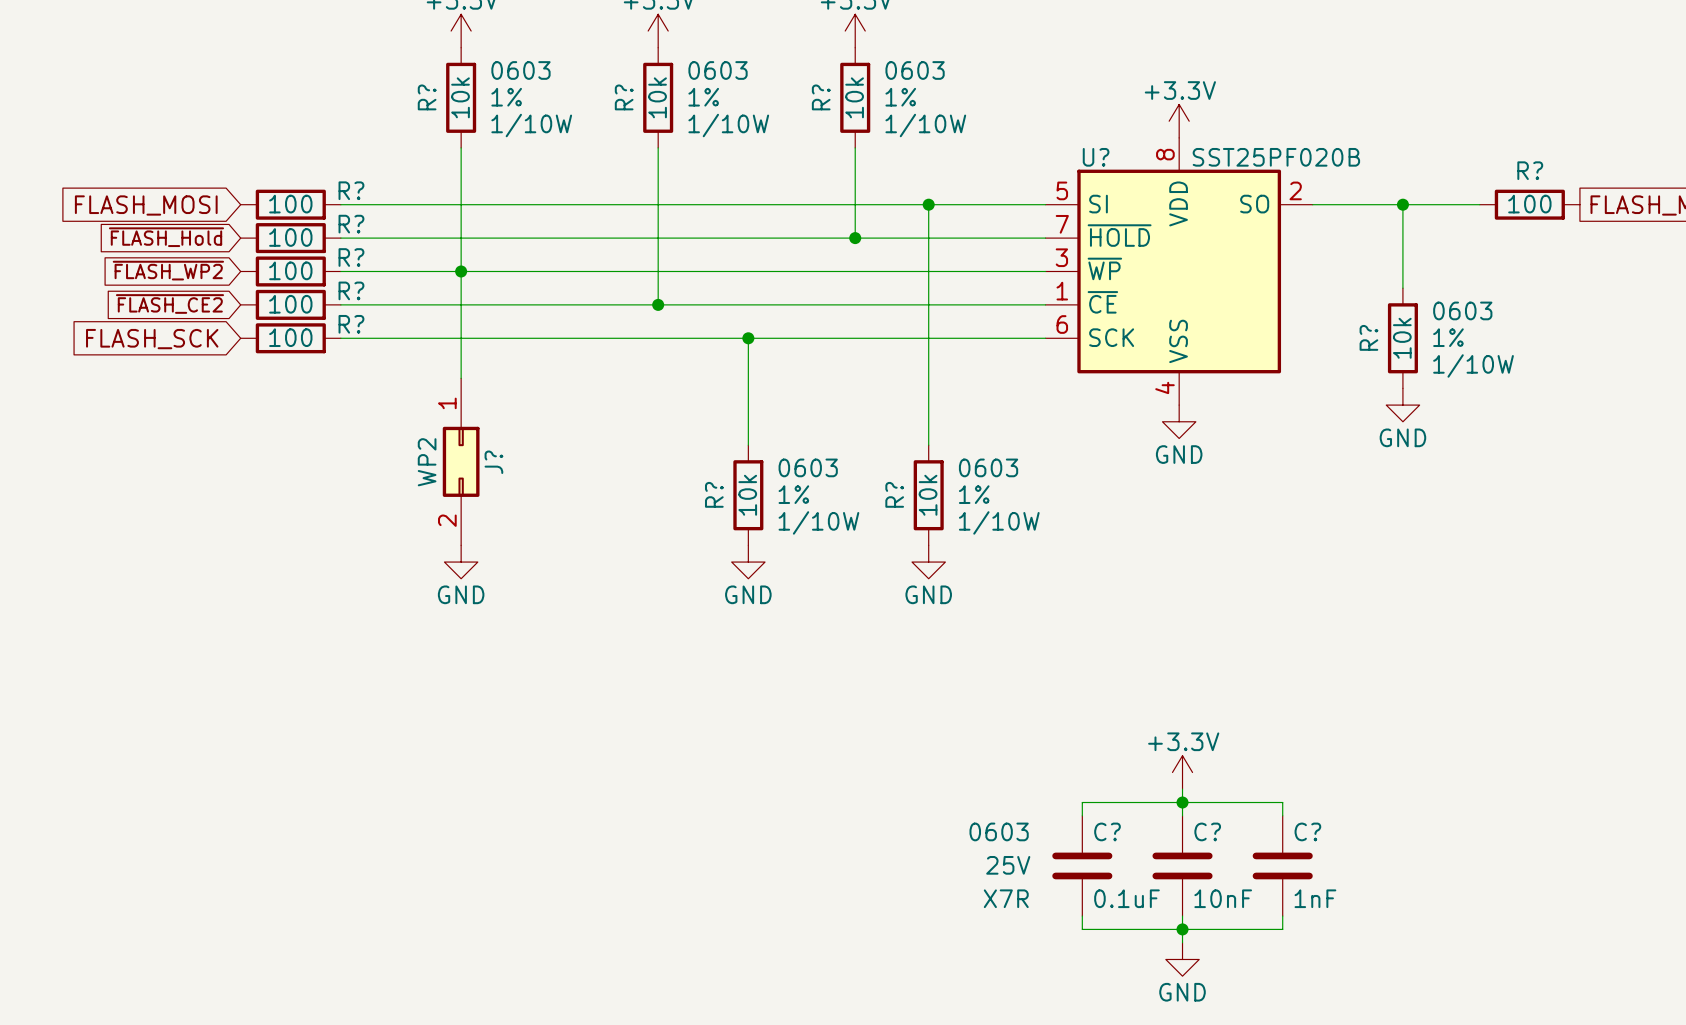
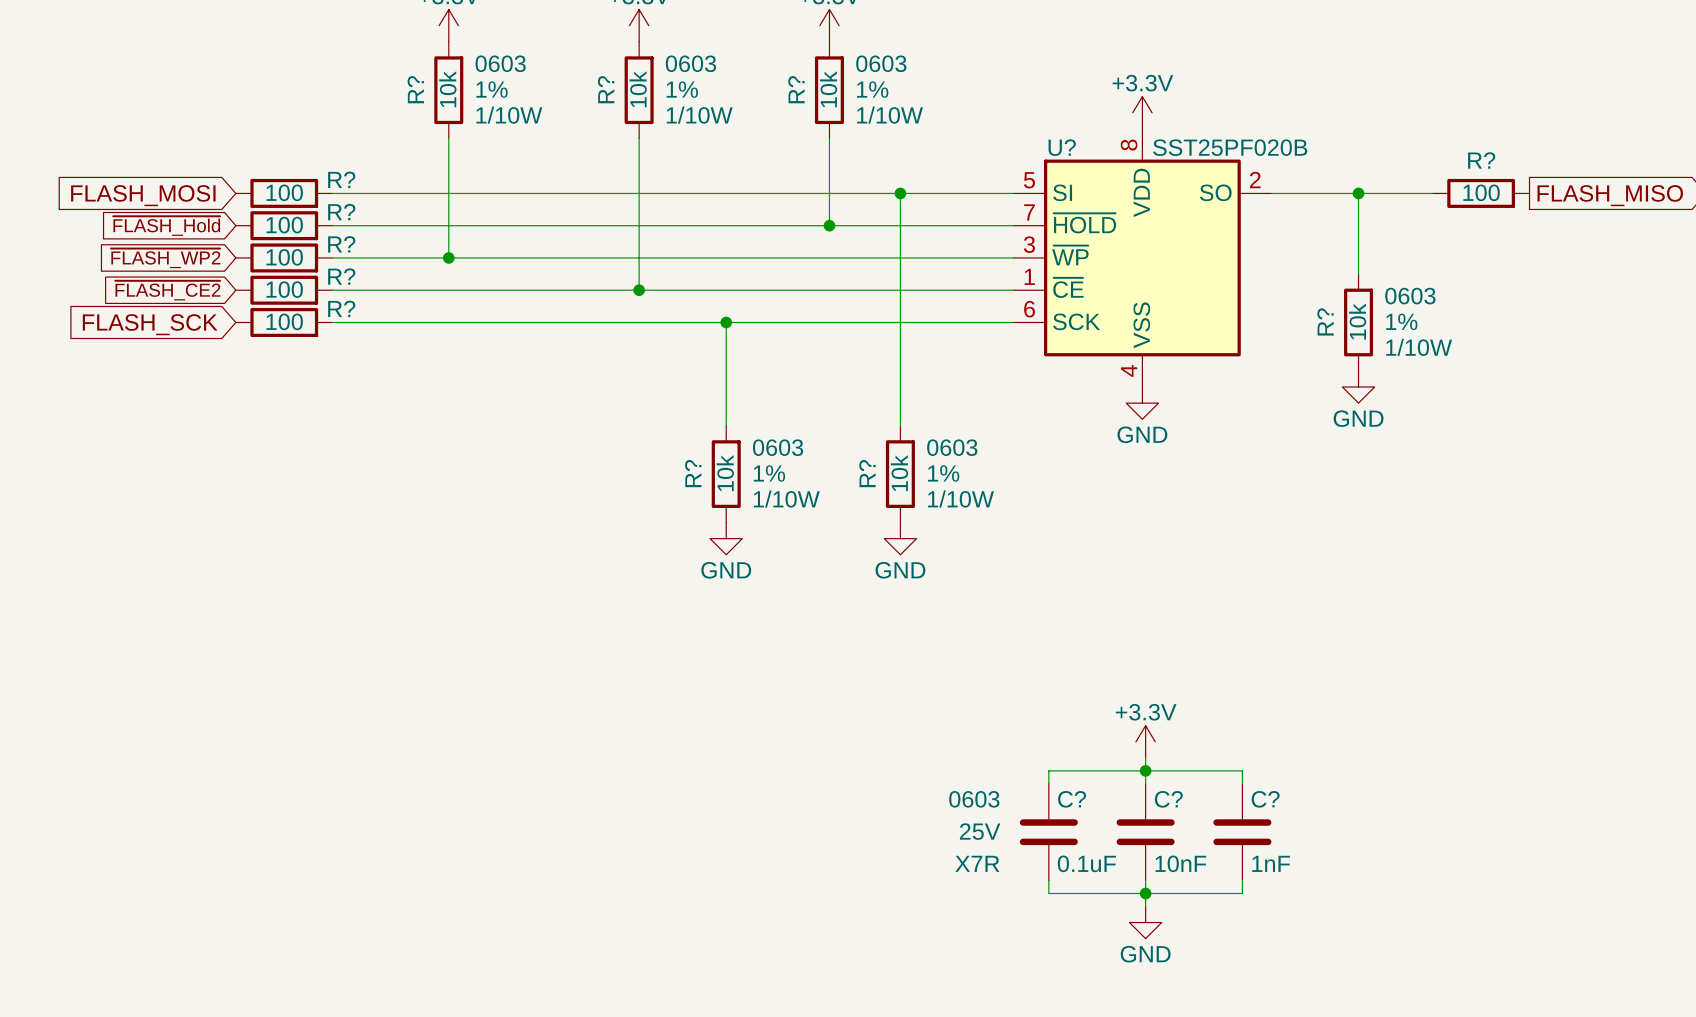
wire: (461, 271) (461, 378) -> none
J?: WP2 (461, 461) -> none
power symbol: GND (461, 562) -> none

